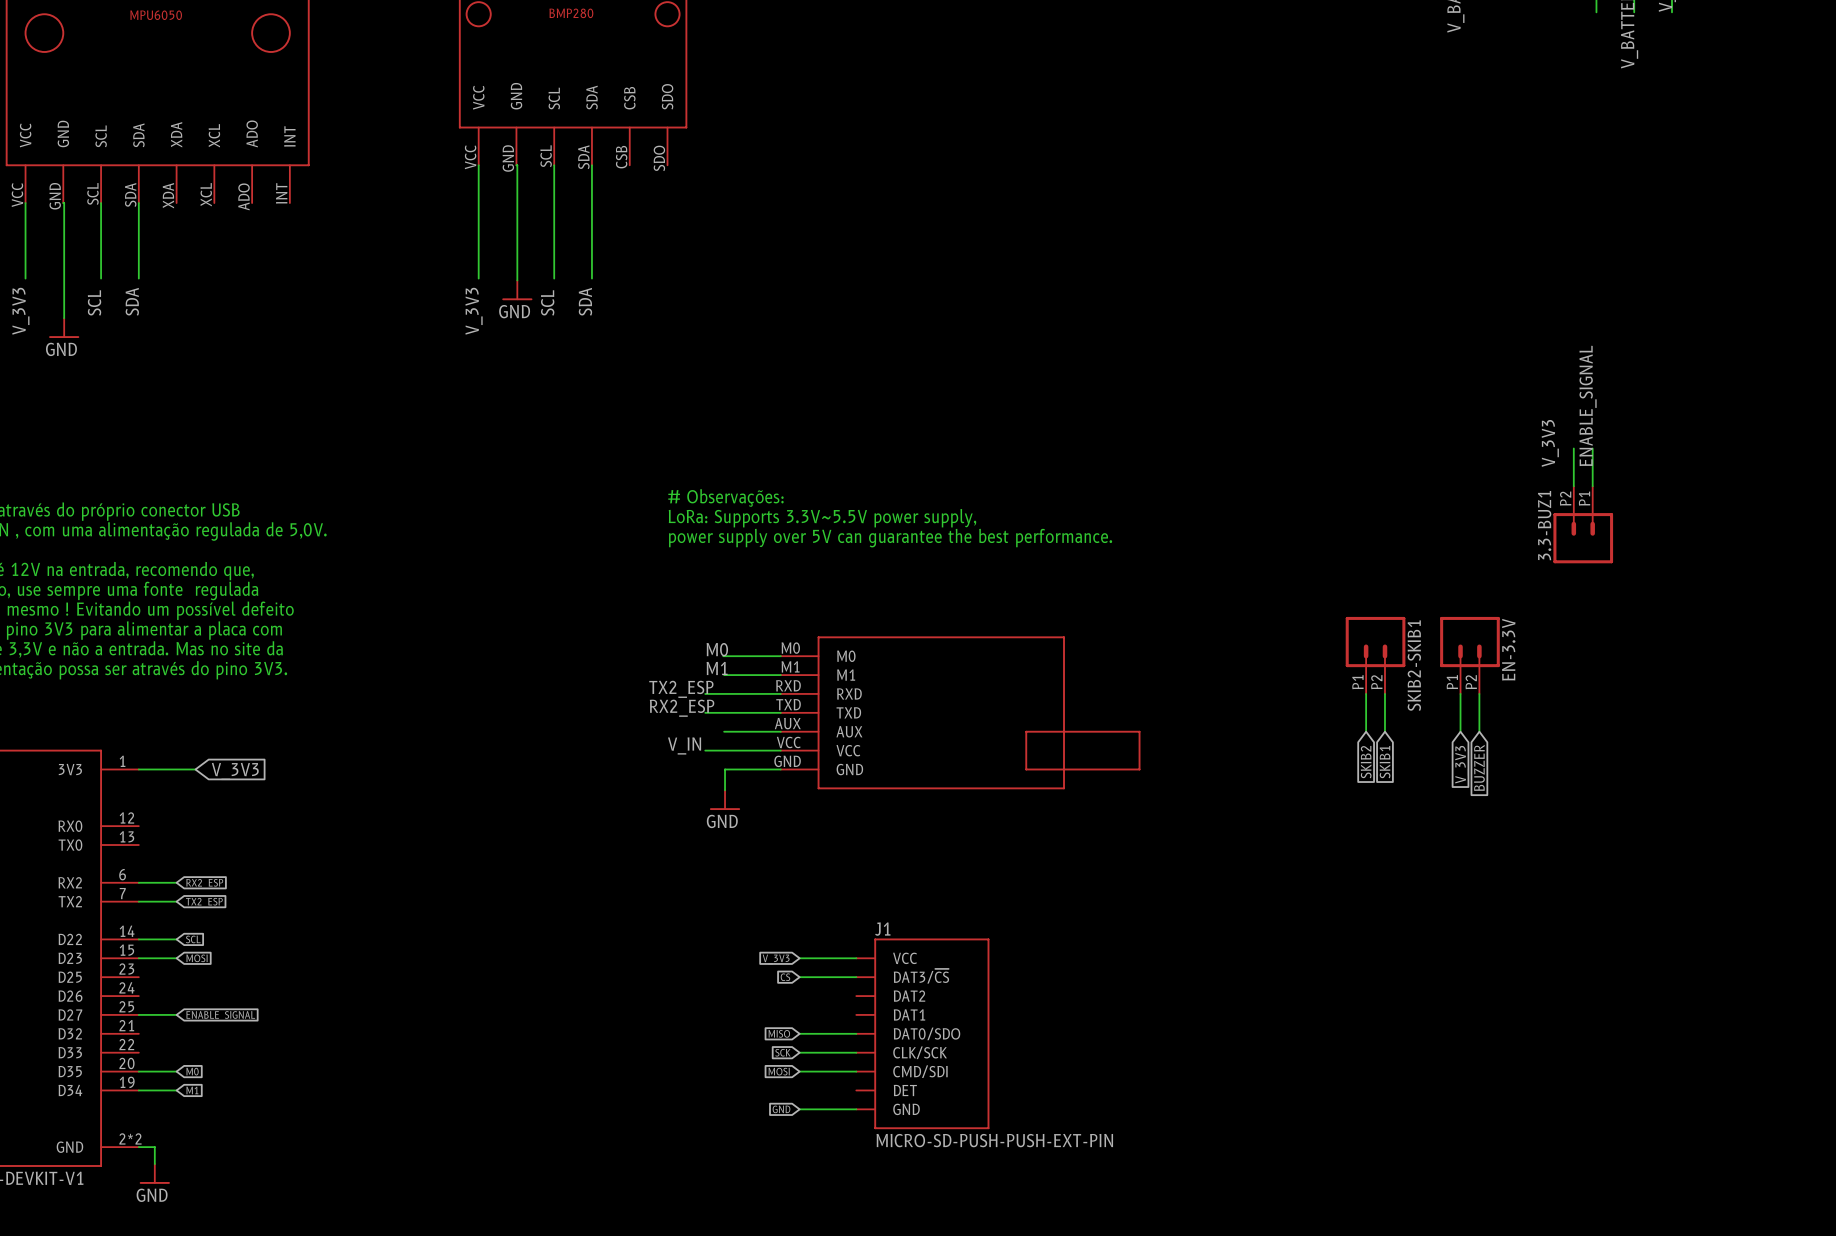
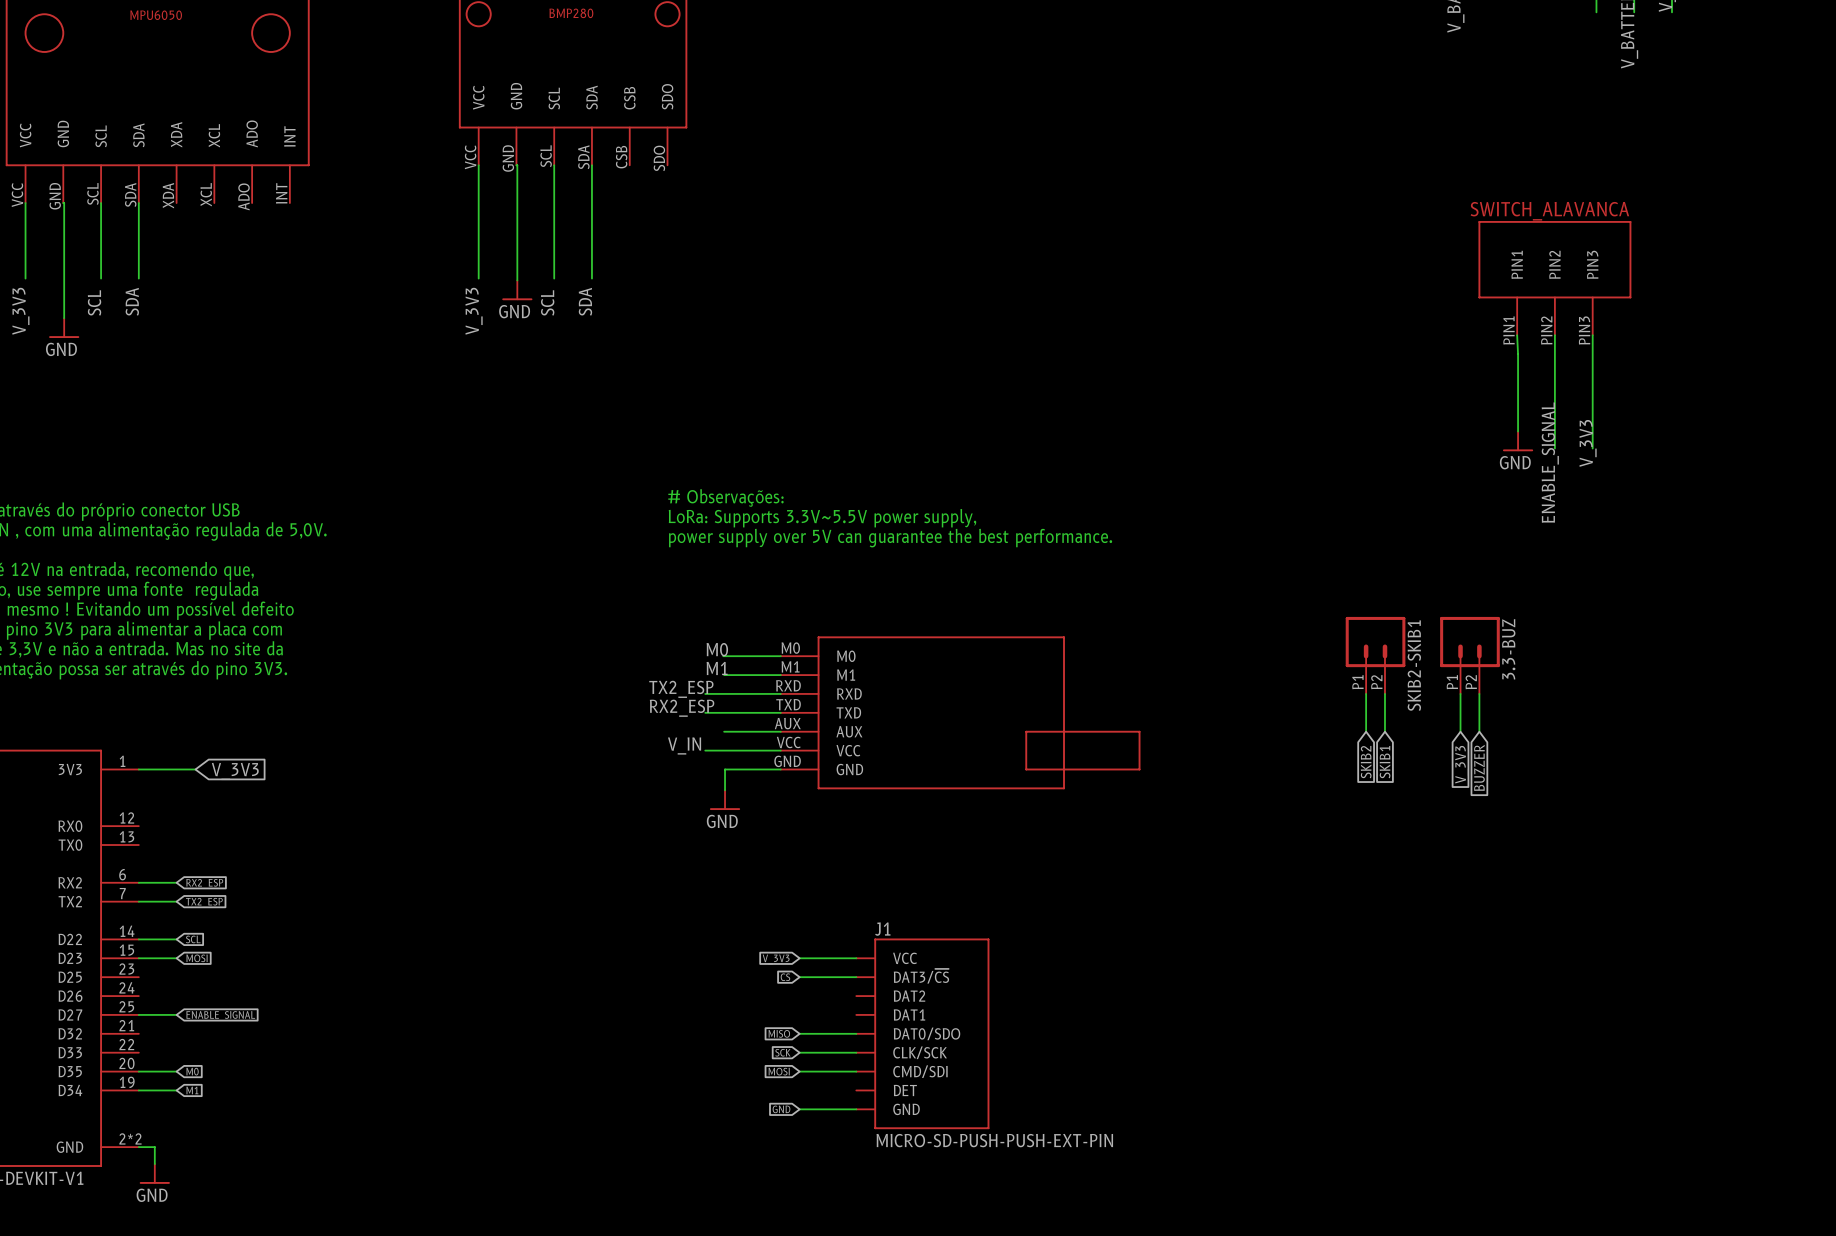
part: none -> (1554, 278)
wire: none -> (1517, 335) (1518, 431)
wire: none -> (1554, 335) (1554, 448)
label: ENABLE_SIGNAL (1588, 405) -> V_3V3 (1588, 443)
power symbol: none -> GND (1518, 441)
label: V_3V3 (1550, 443) -> none
wire: (1573, 448) (1573, 486) -> none
wire: (1592, 448) (1592, 486) -> (1592, 448) (1592, 335)
label: none -> ENABLE_SIGNAL (1550, 462)
3.3-BUZ1: (1583, 524) -> none
EN-3.3V name: EN-3.3V (1508, 649) -> 3.3-BUZ (1508, 649)

